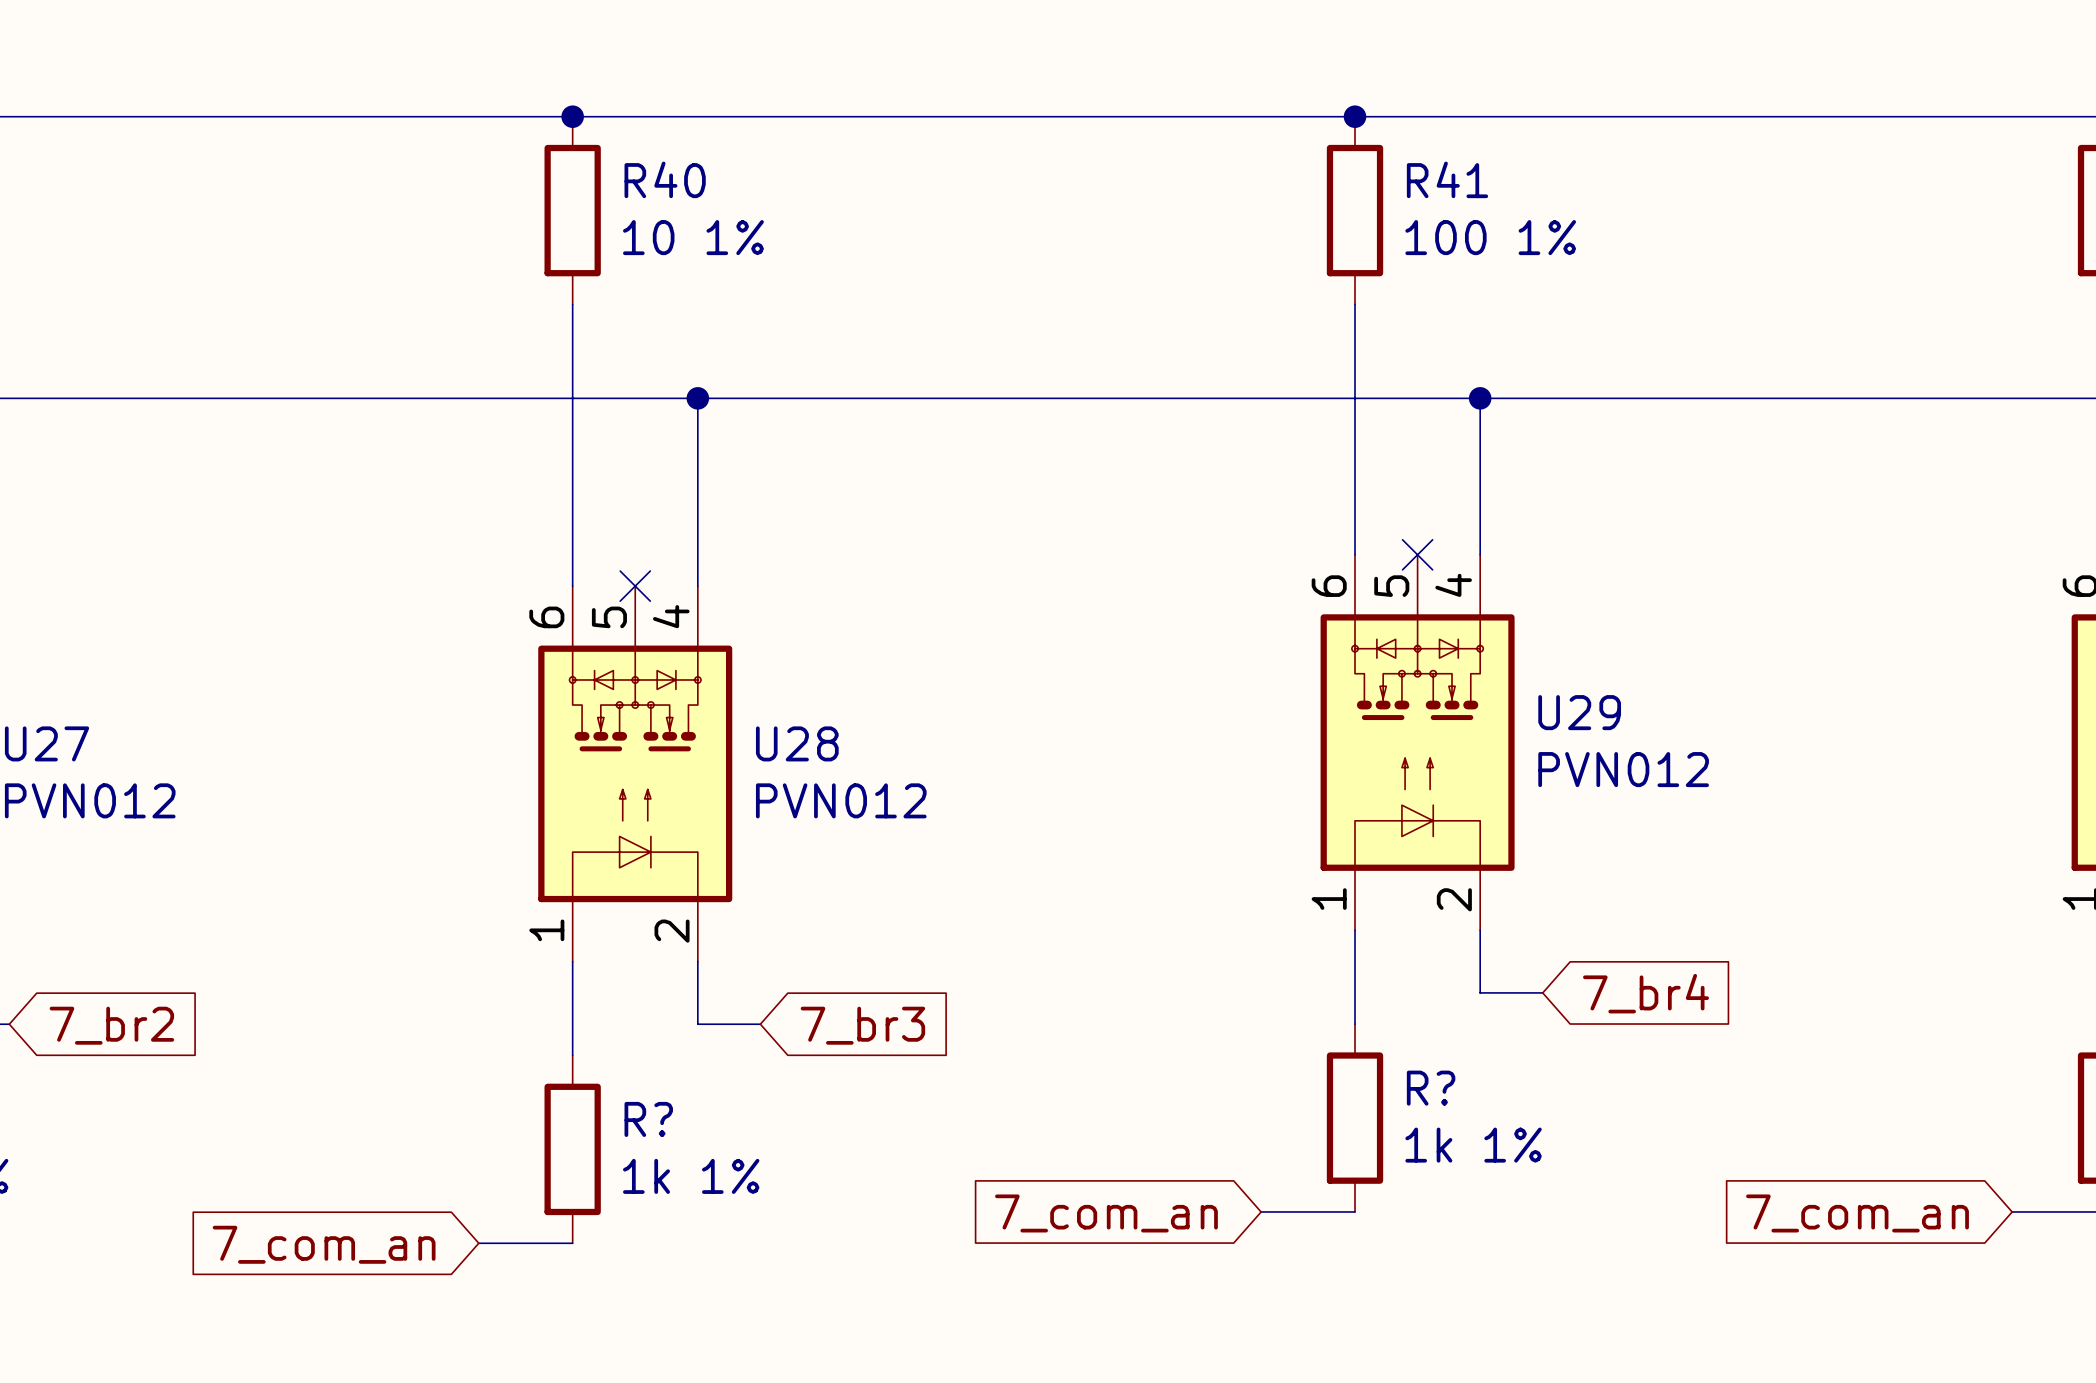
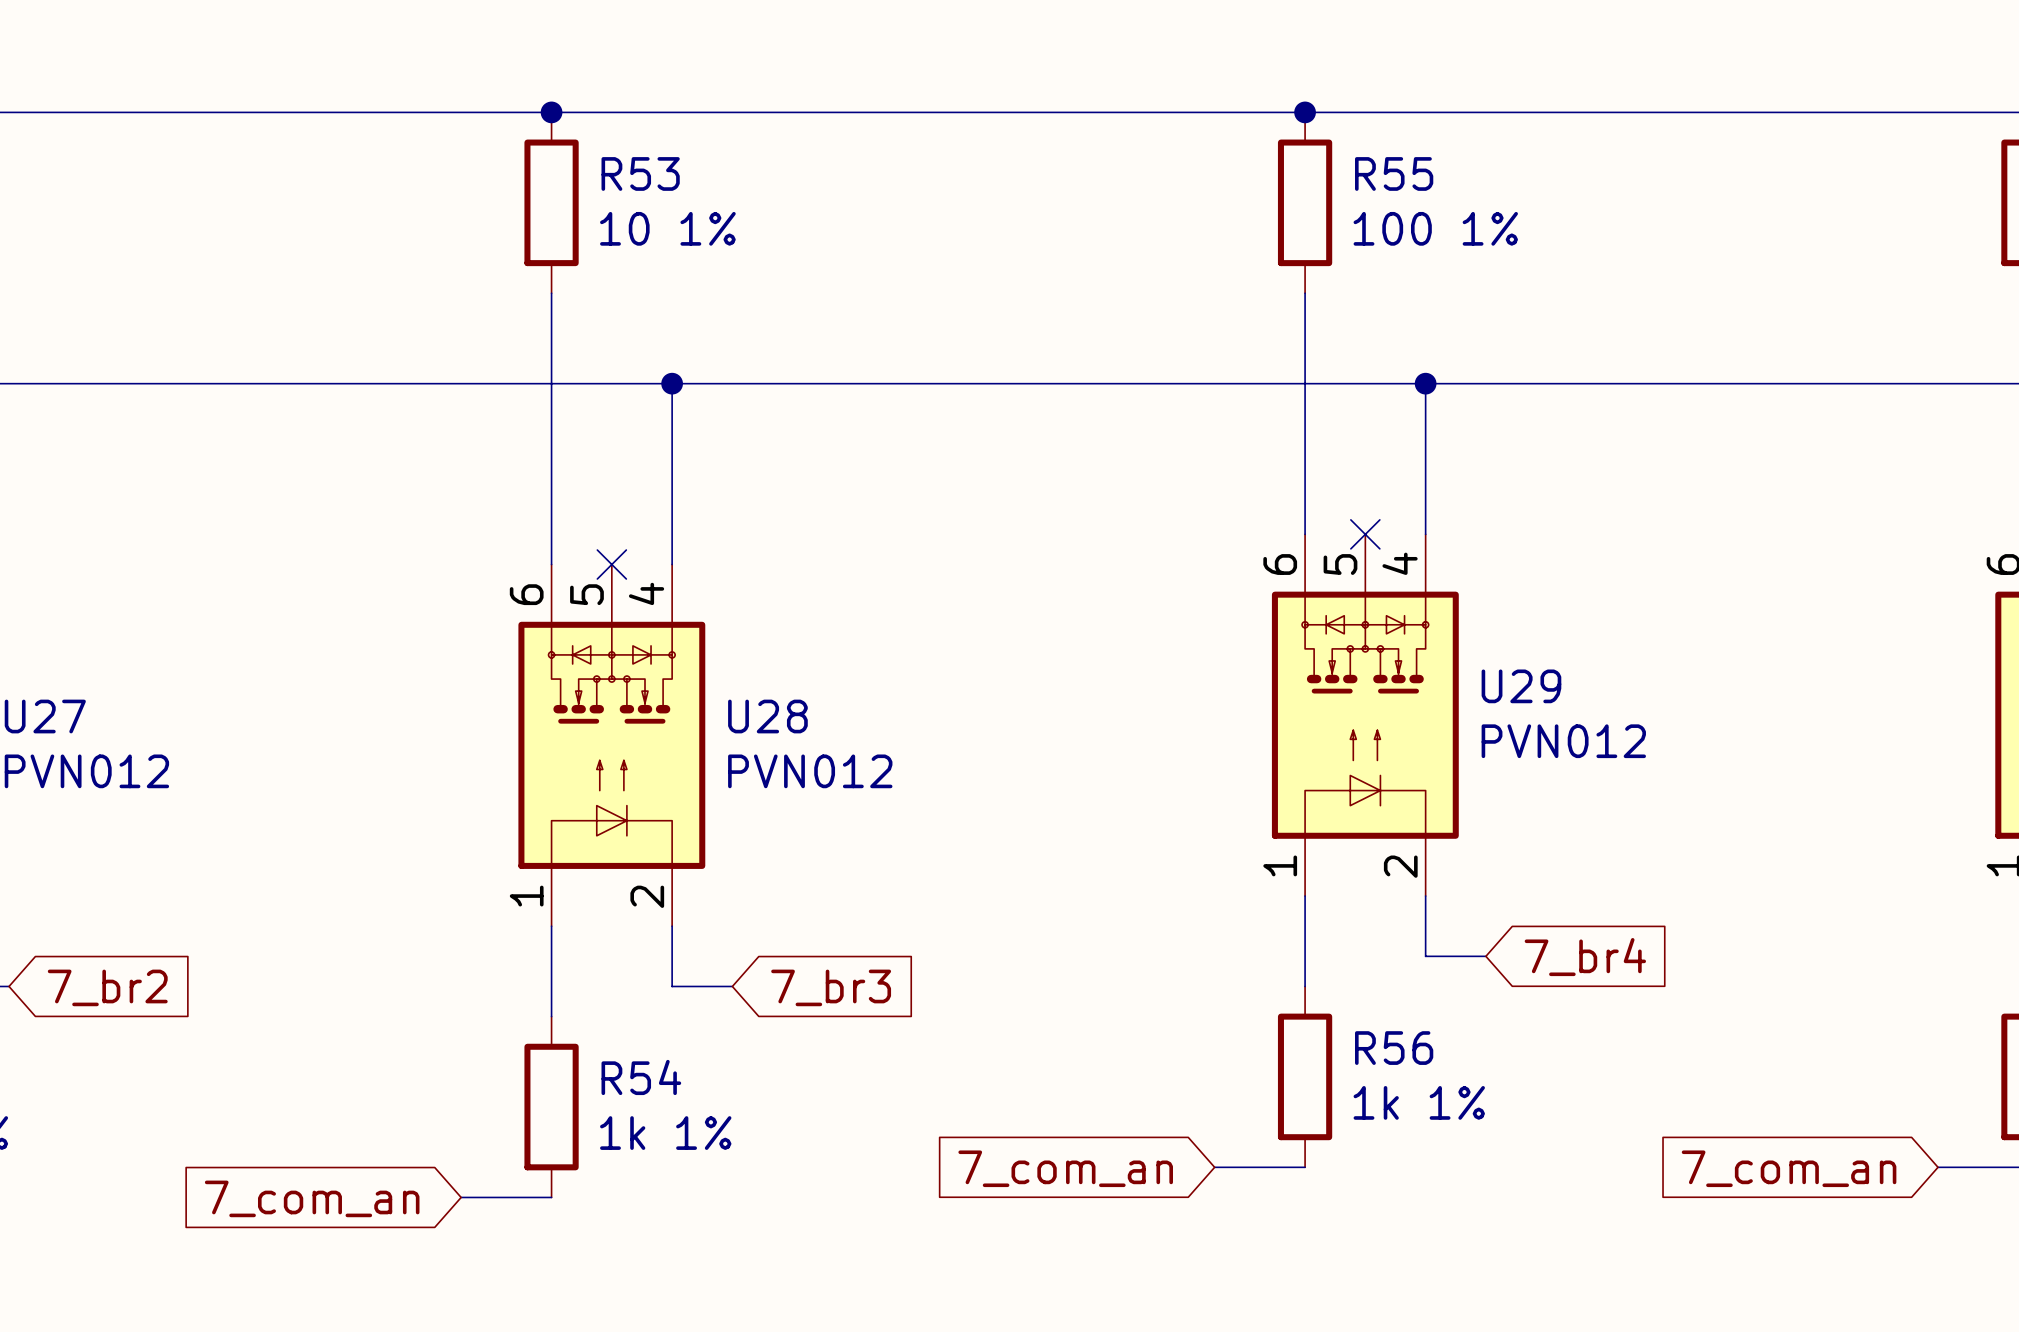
R40 name: R40 (665, 179) -> R53 (640, 173)
R41 name: R41 (1447, 179) -> R55 (1394, 173)
R? name: R? (1431, 1088) -> R56 (1394, 1048)
R? name: R? (648, 1119) -> R54 (641, 1077)

